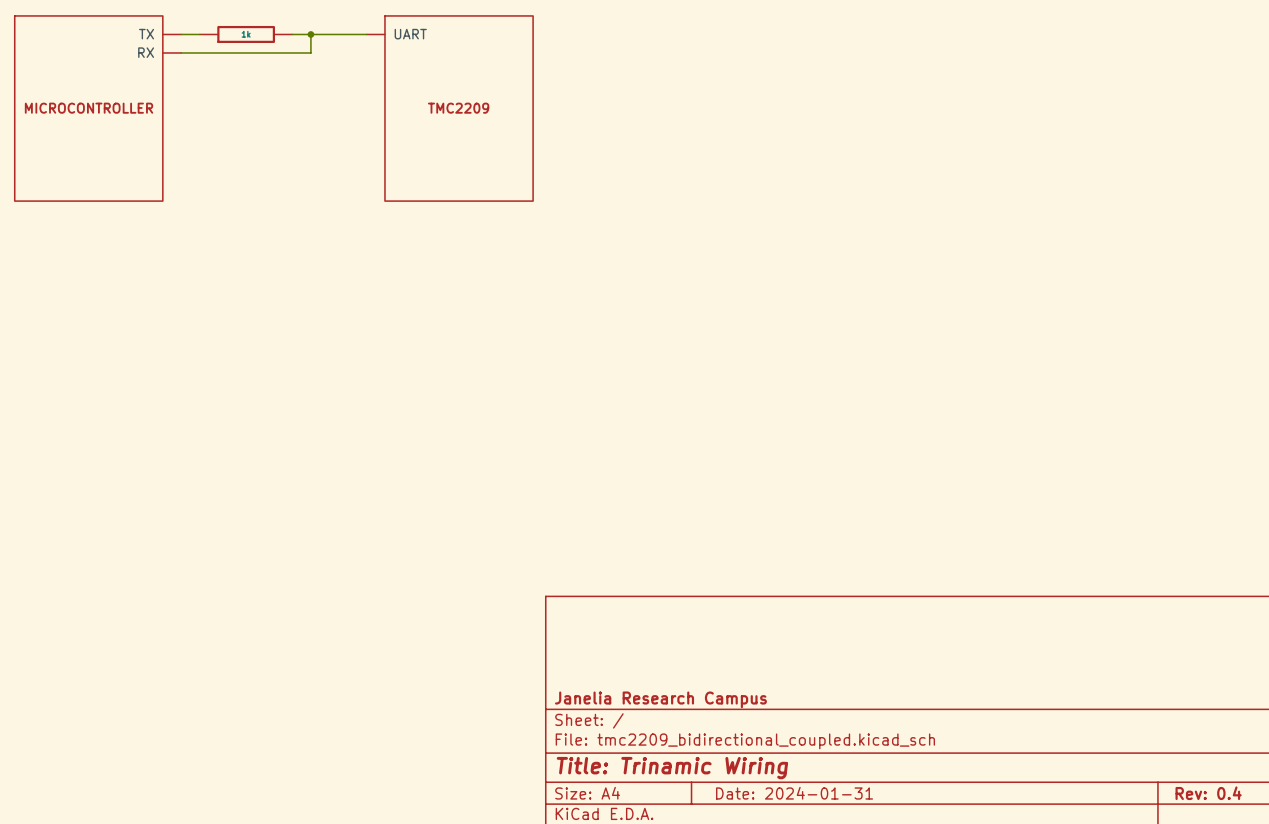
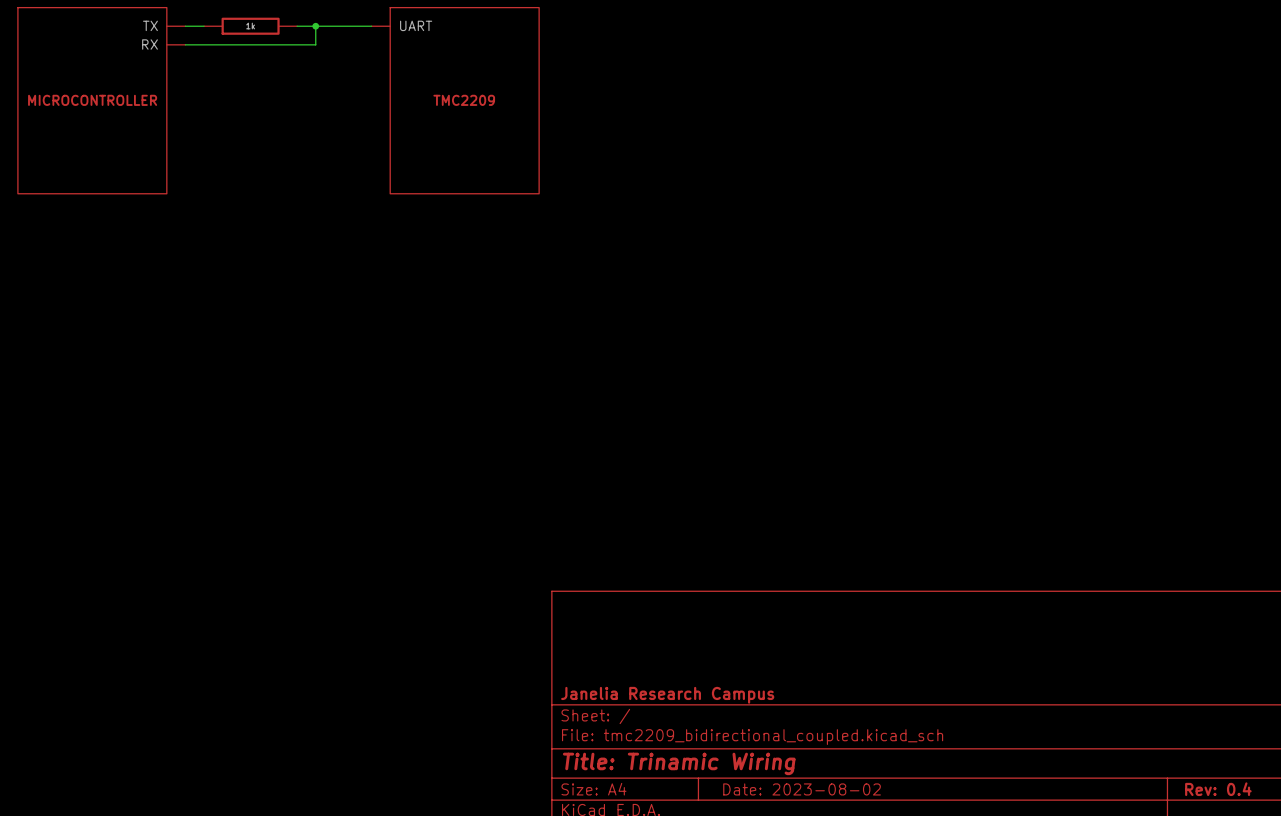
title block: Date: 2024-01-31 (794, 793) -> Date: 2023-08-02 (802, 789)

